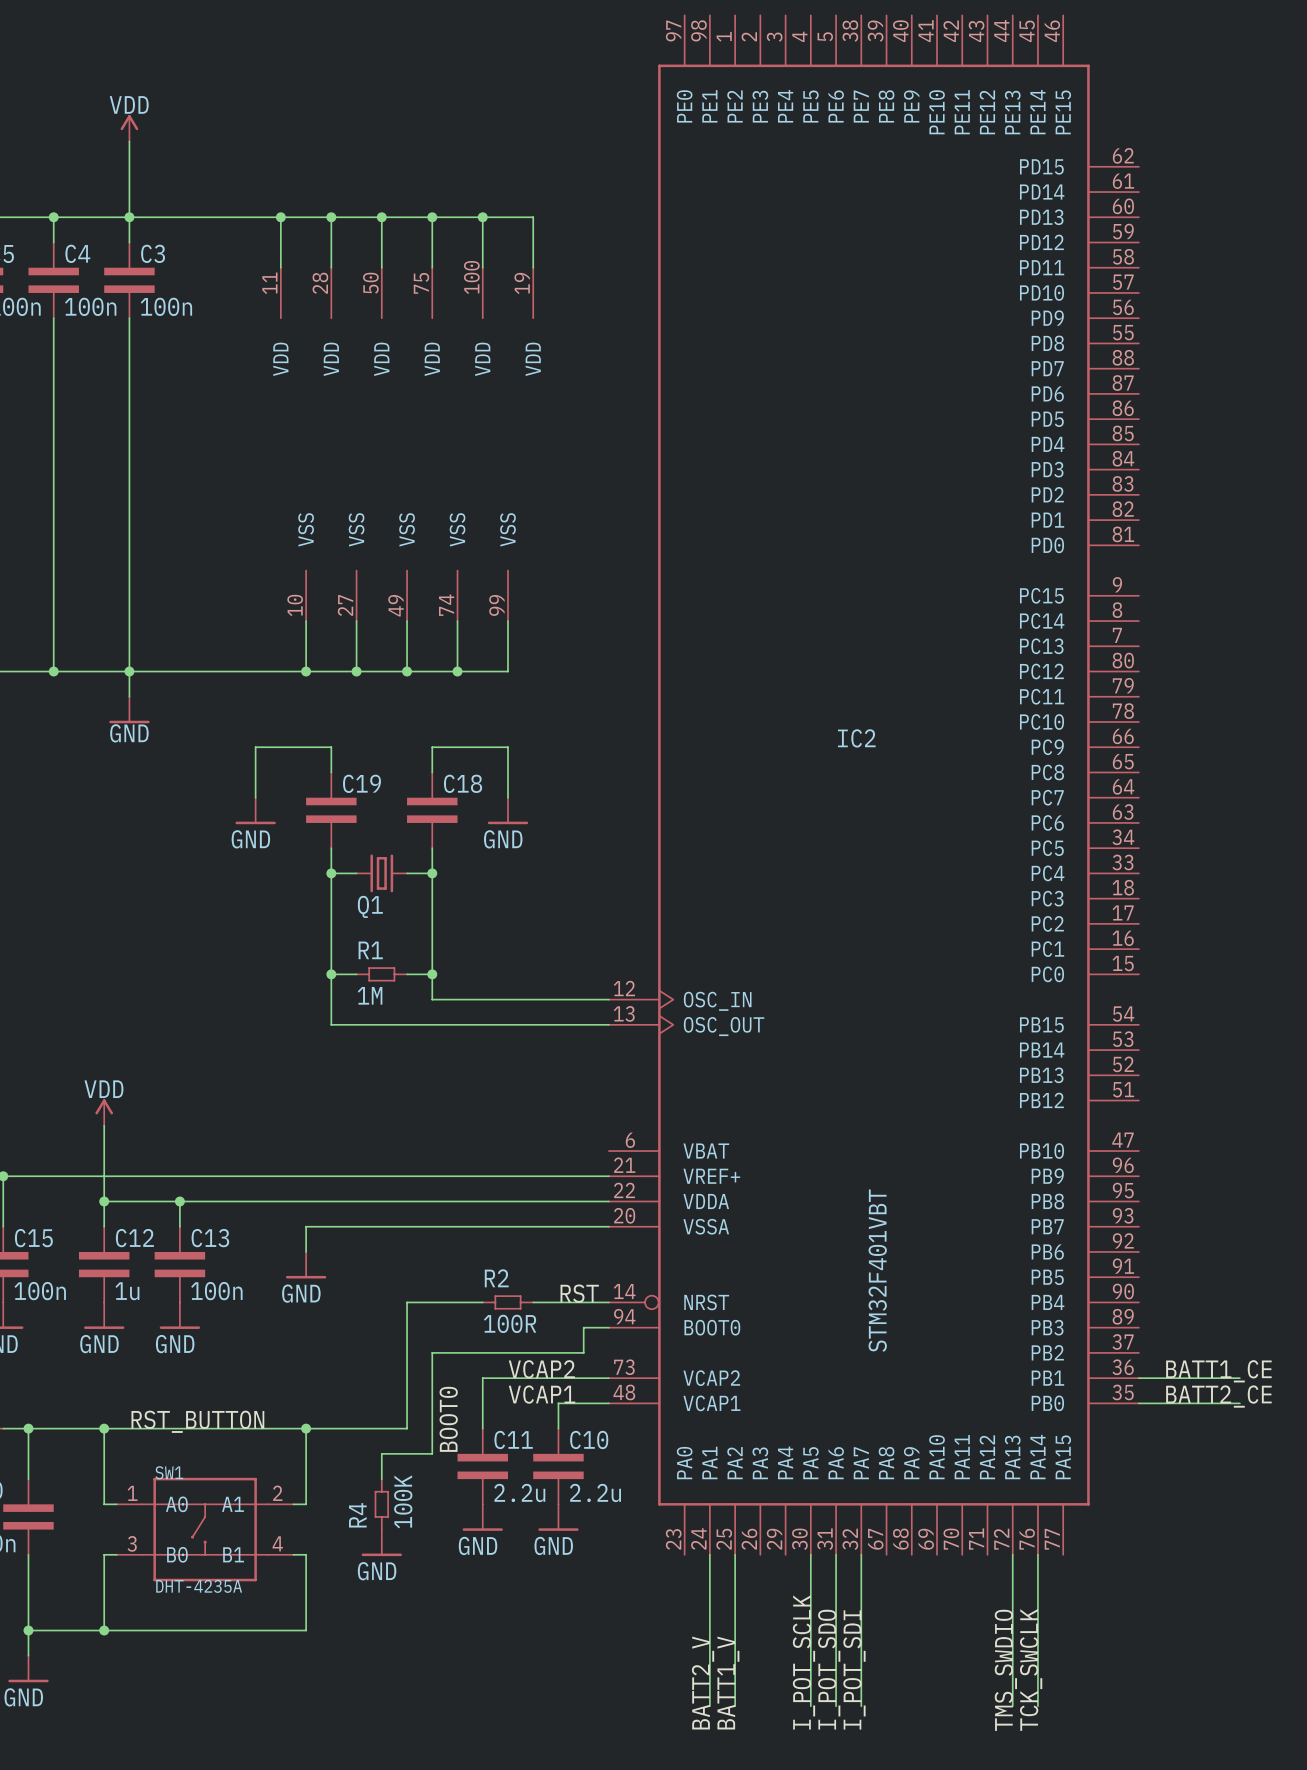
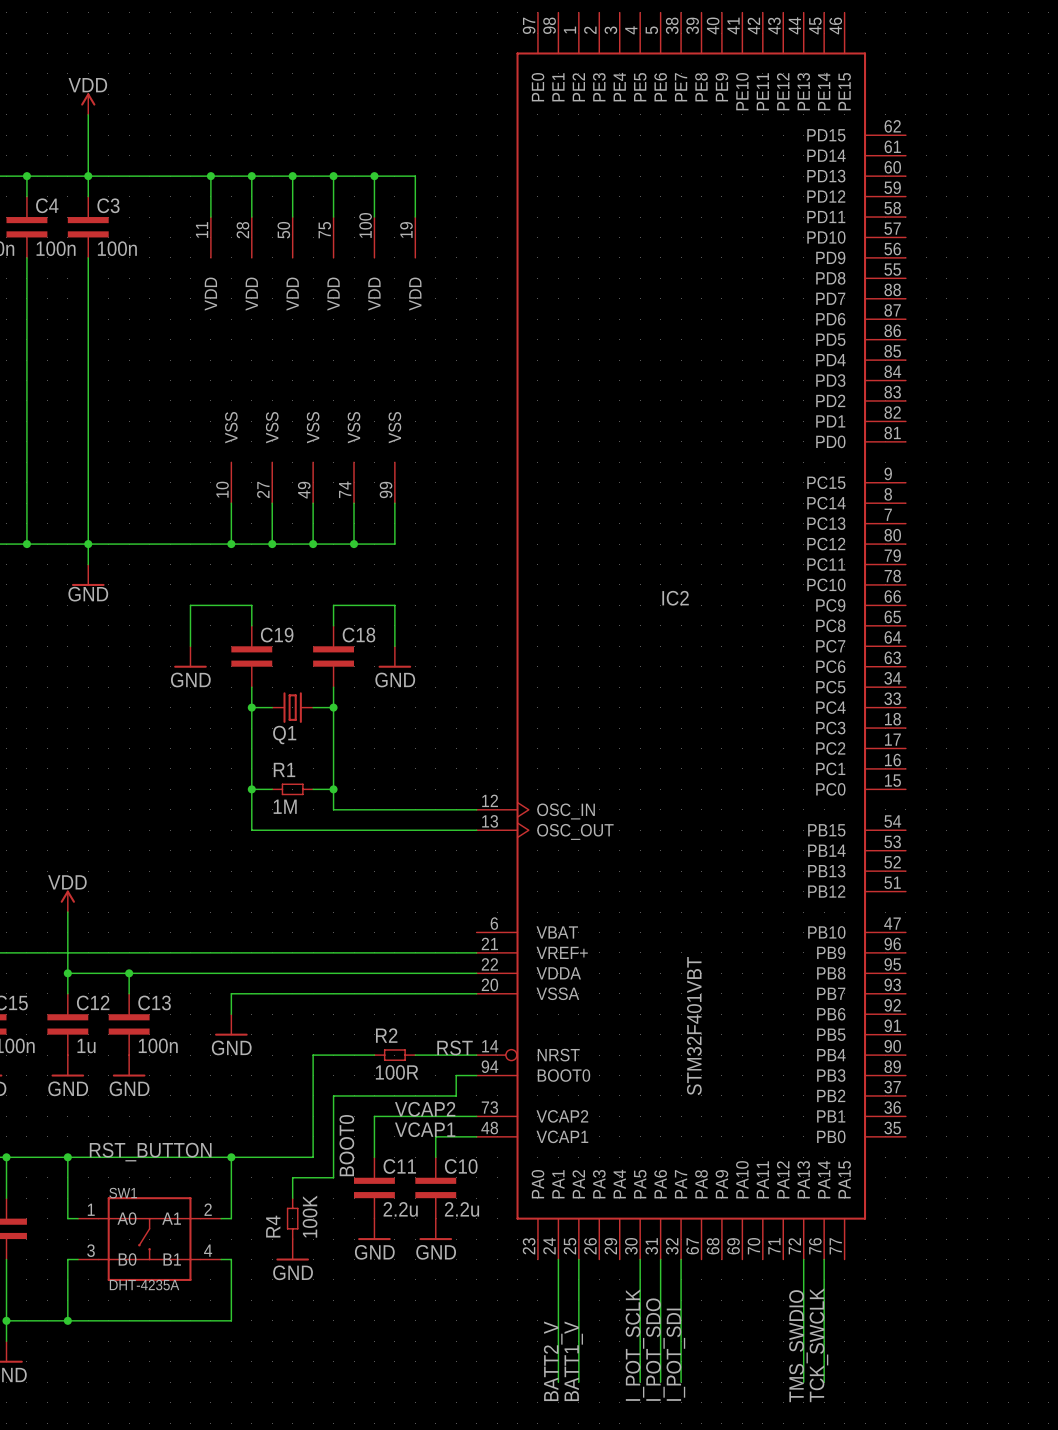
label: BATT1_CE (1218, 1371) -> none
wire: (1138, 1378) (1239, 1378) -> none
label: BATT2_CE (1218, 1396) -> none
wire: (1138, 1403) (1239, 1403) -> none

